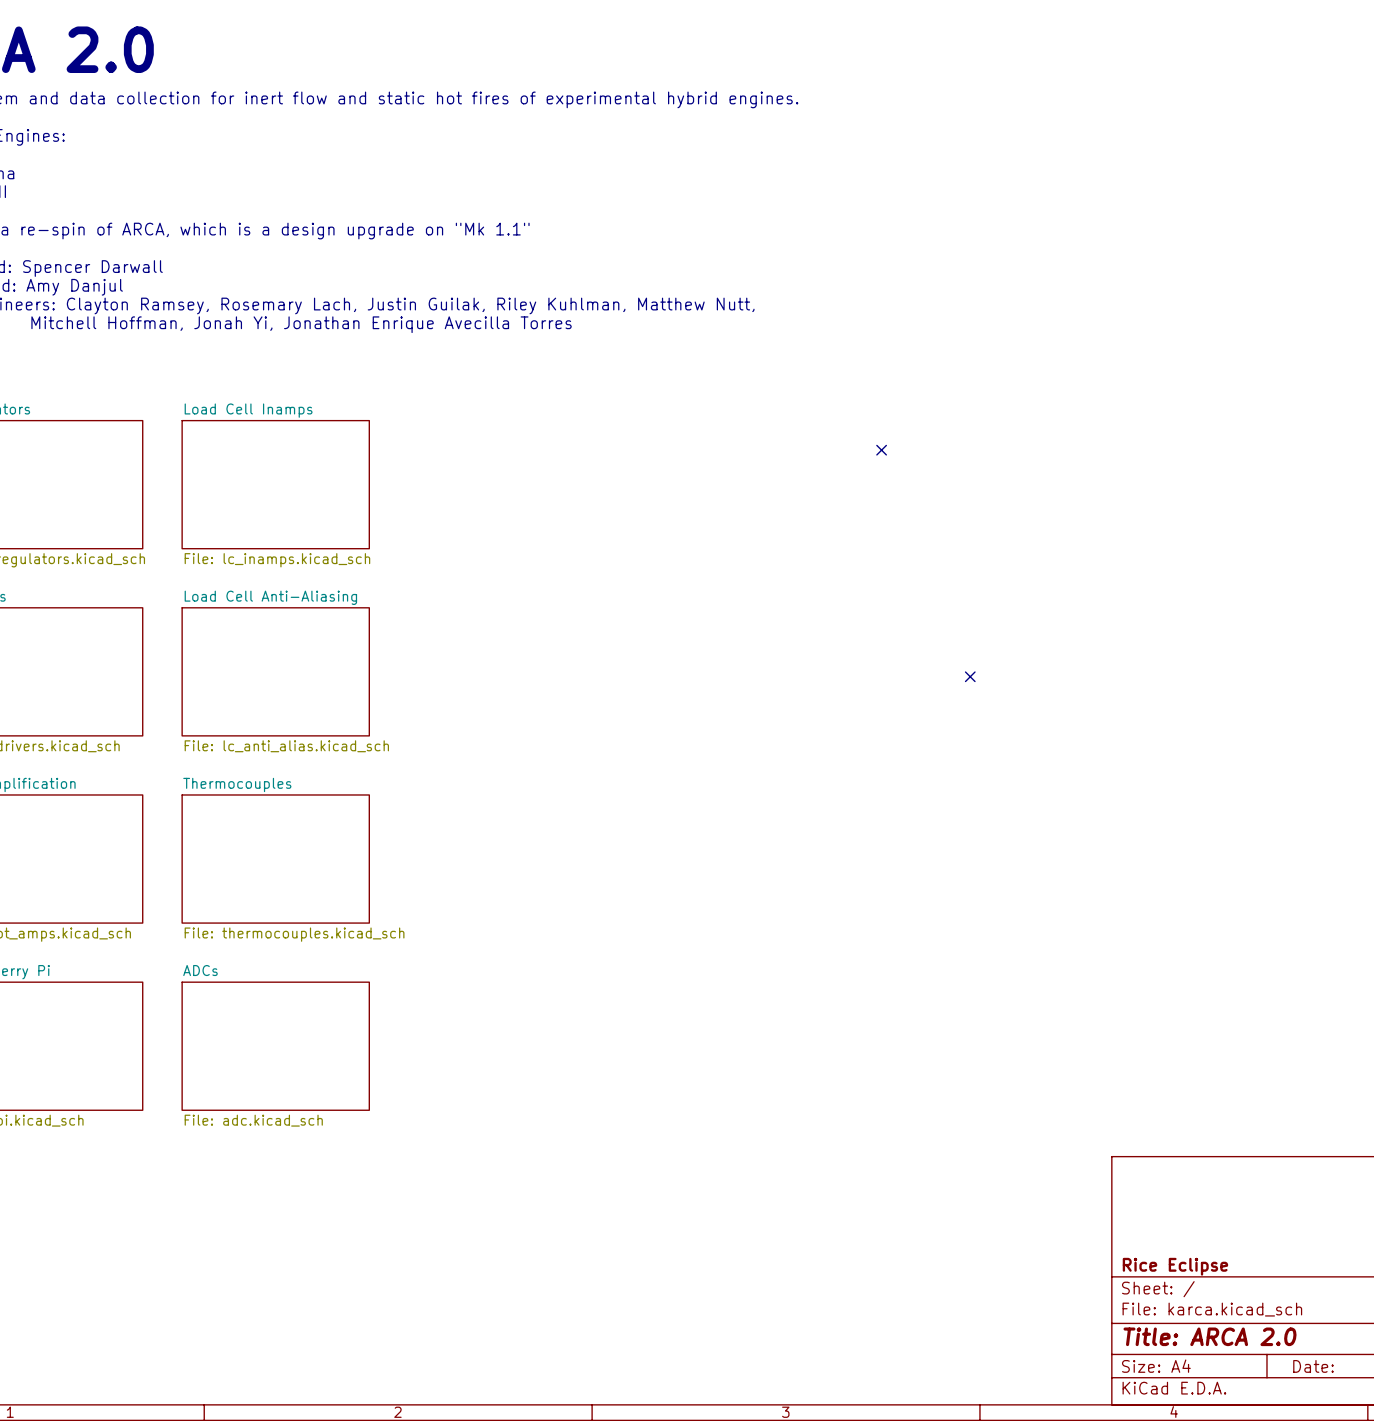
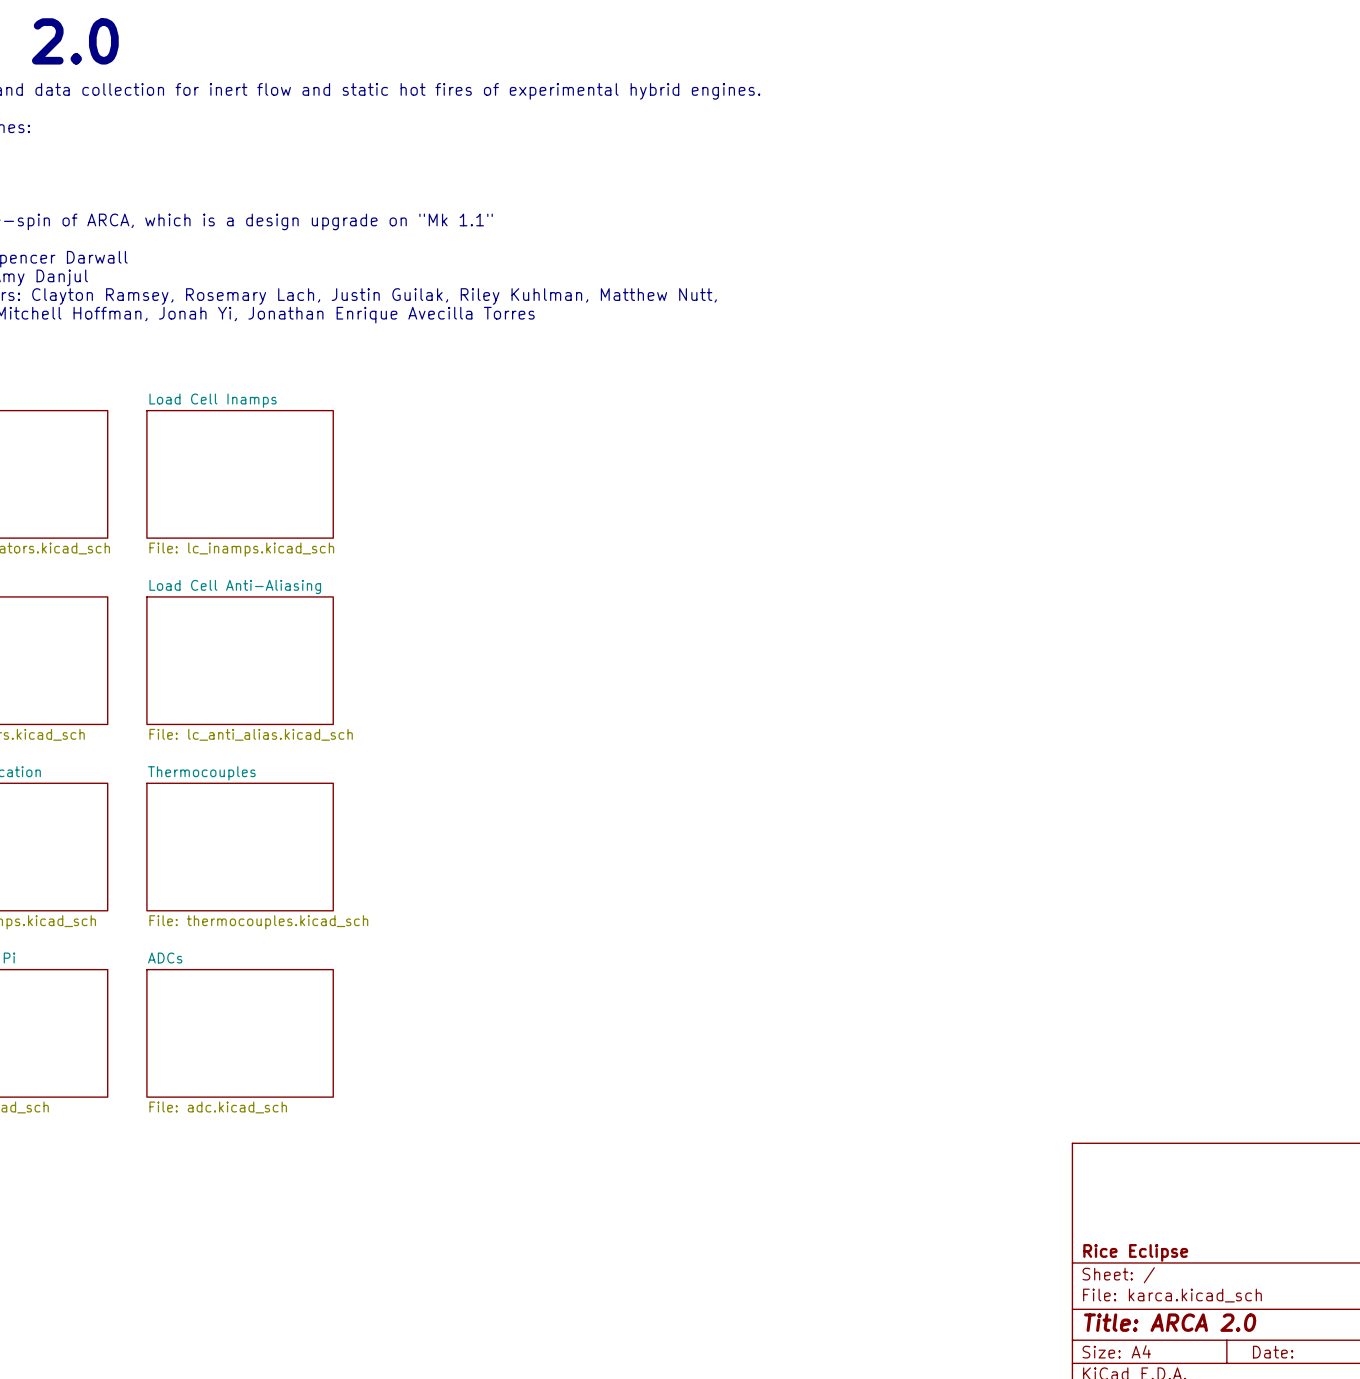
no-connect mark: (881, 450) -> none
no-connect mark: (970, 676) -> none

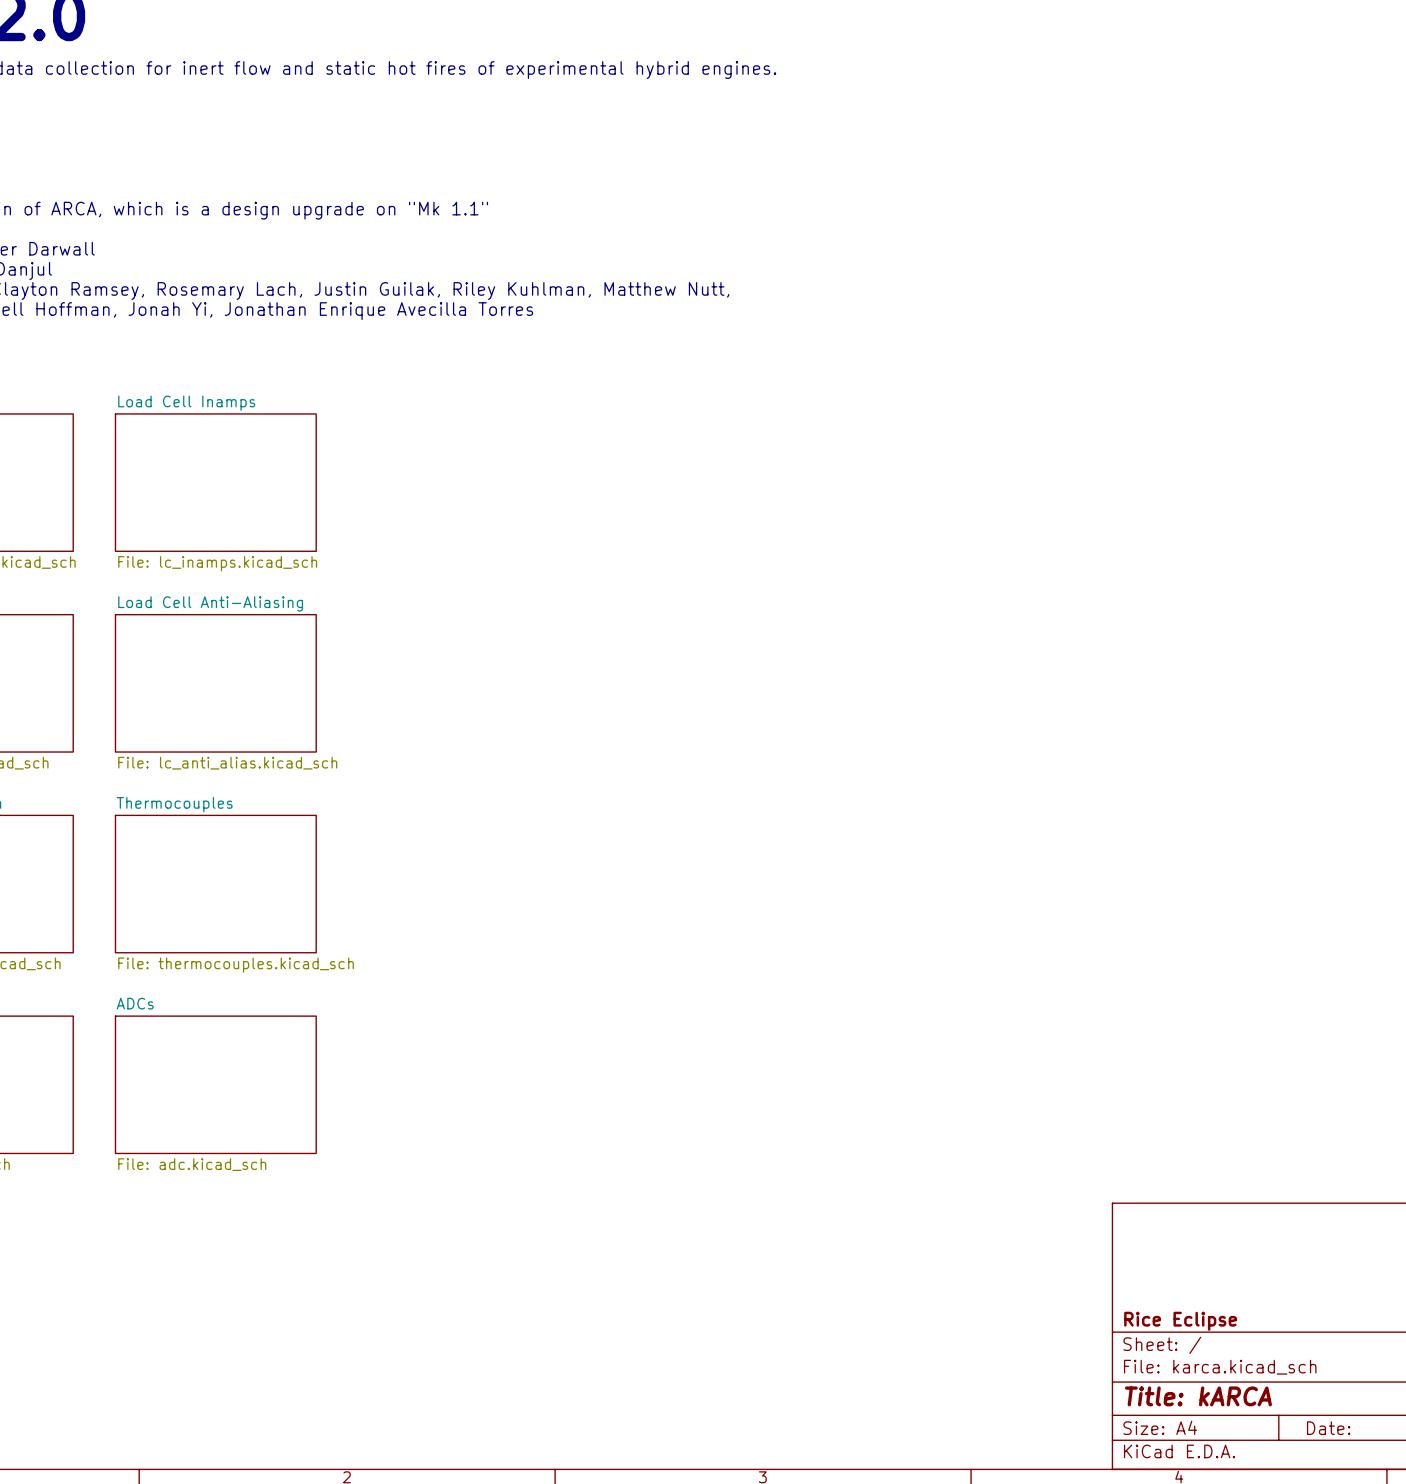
title block: Title: ARCA 2.0 (1170, 1322) -> Title: kARCA (1198, 1396)

